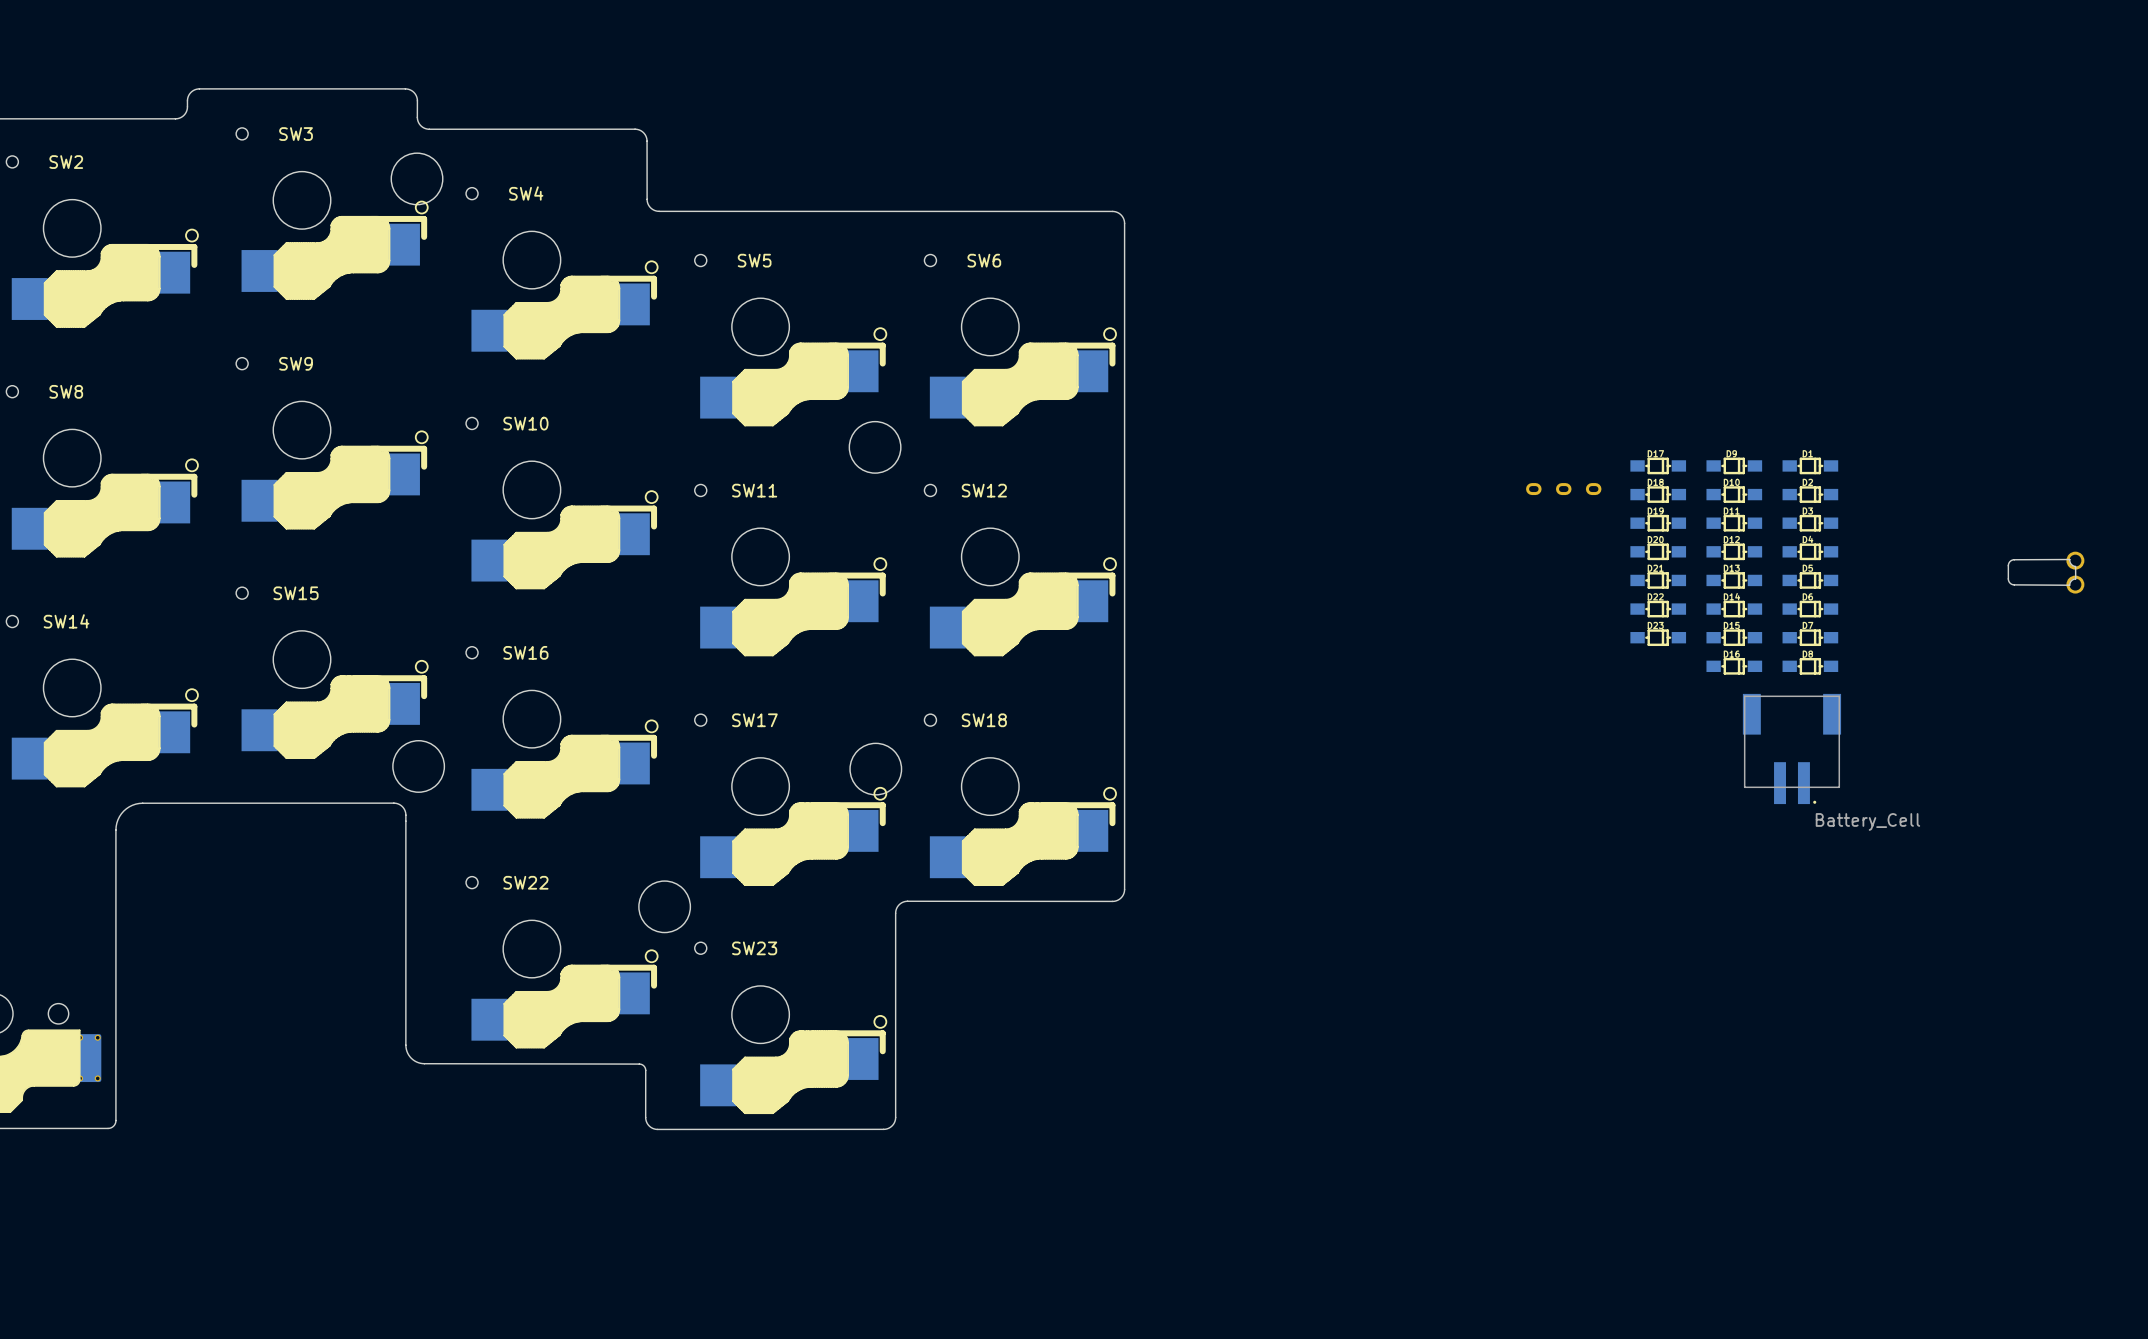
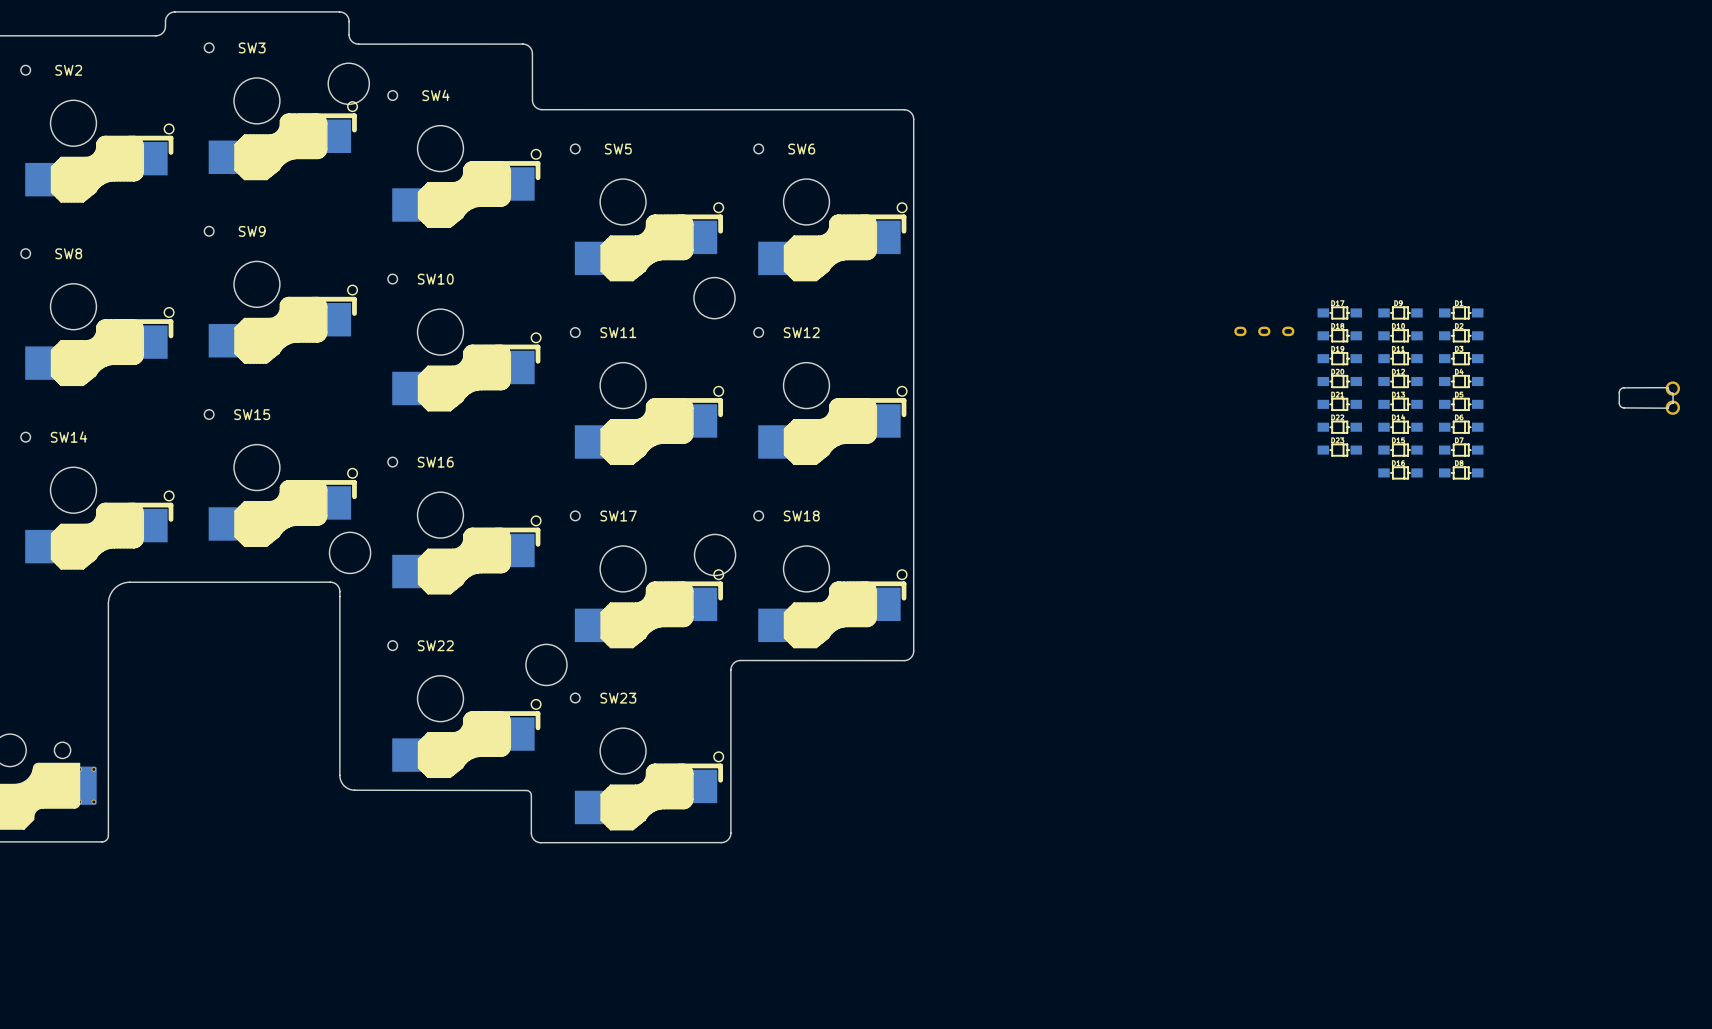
part: Battery_Cell (1791, 748) -> none

